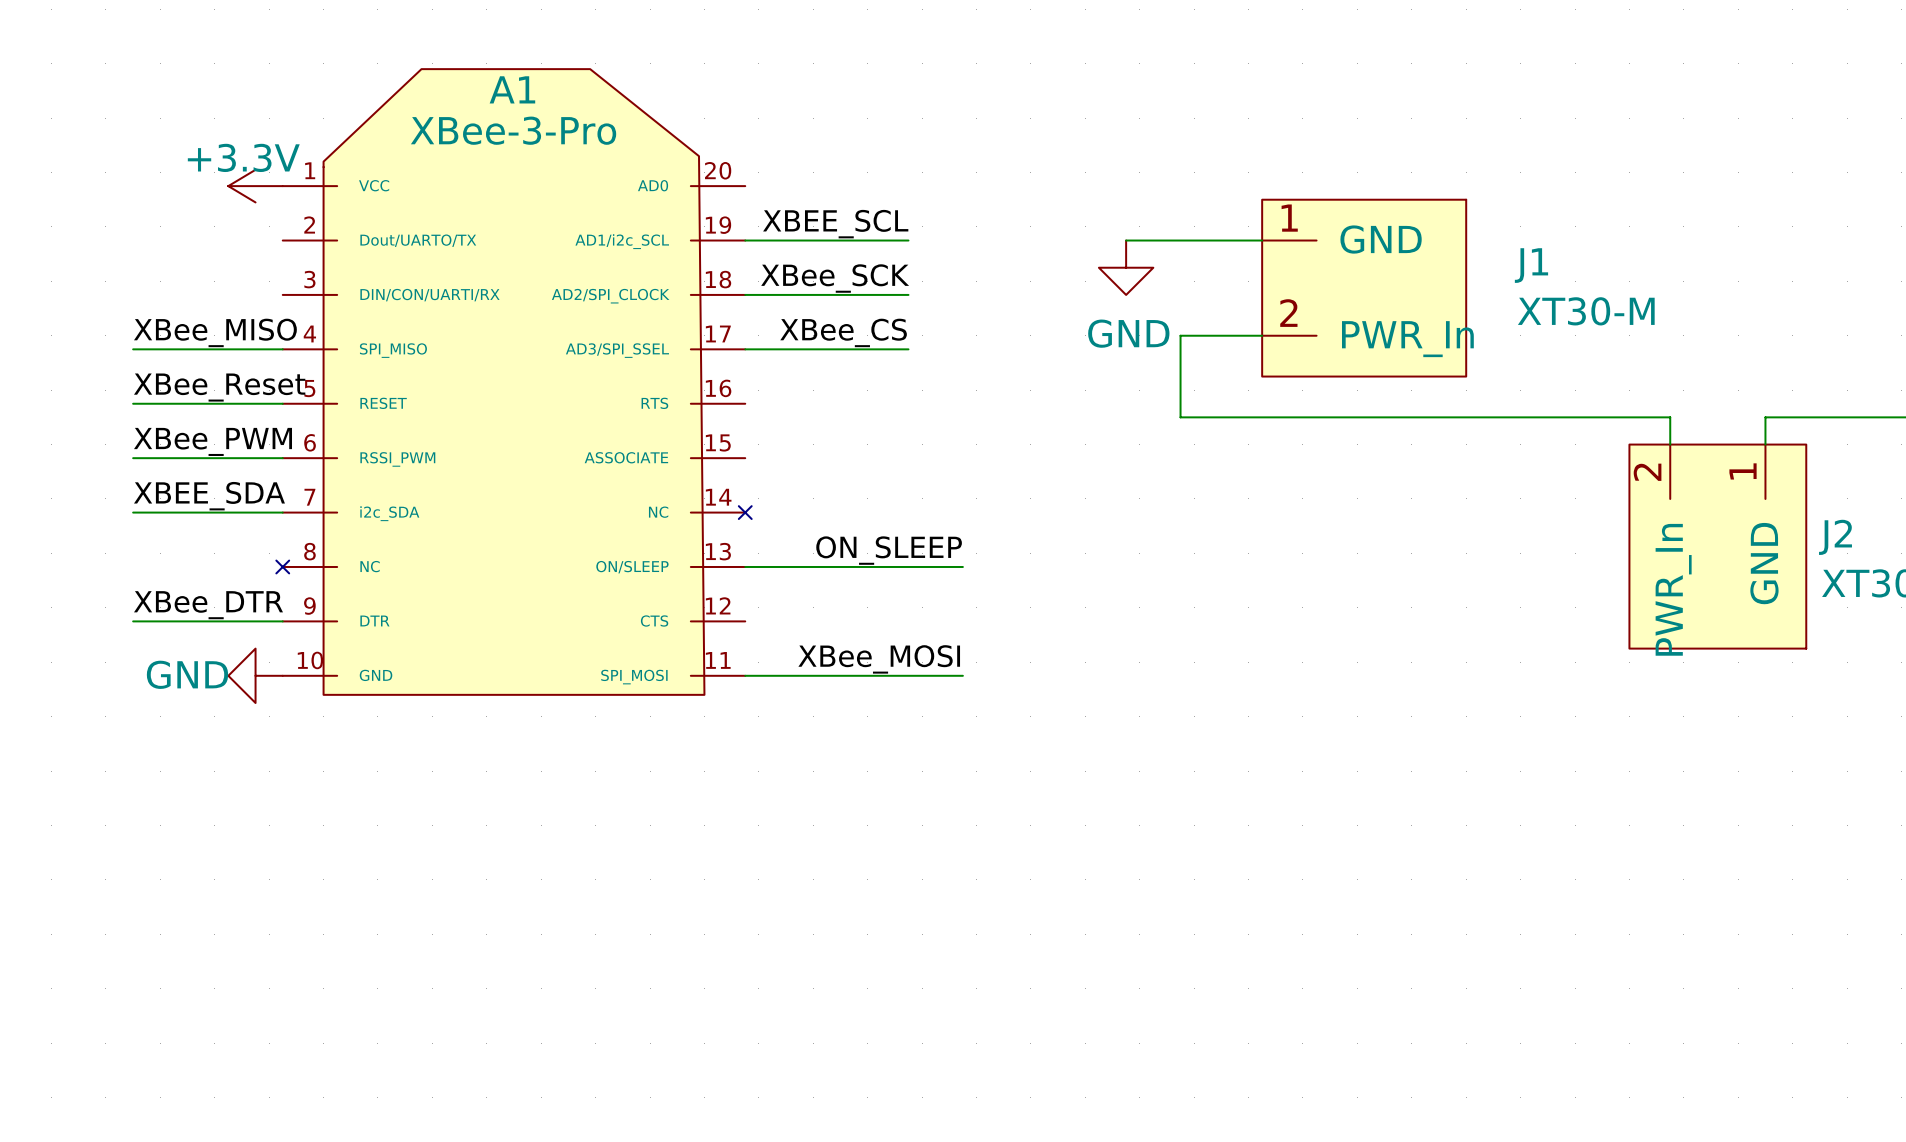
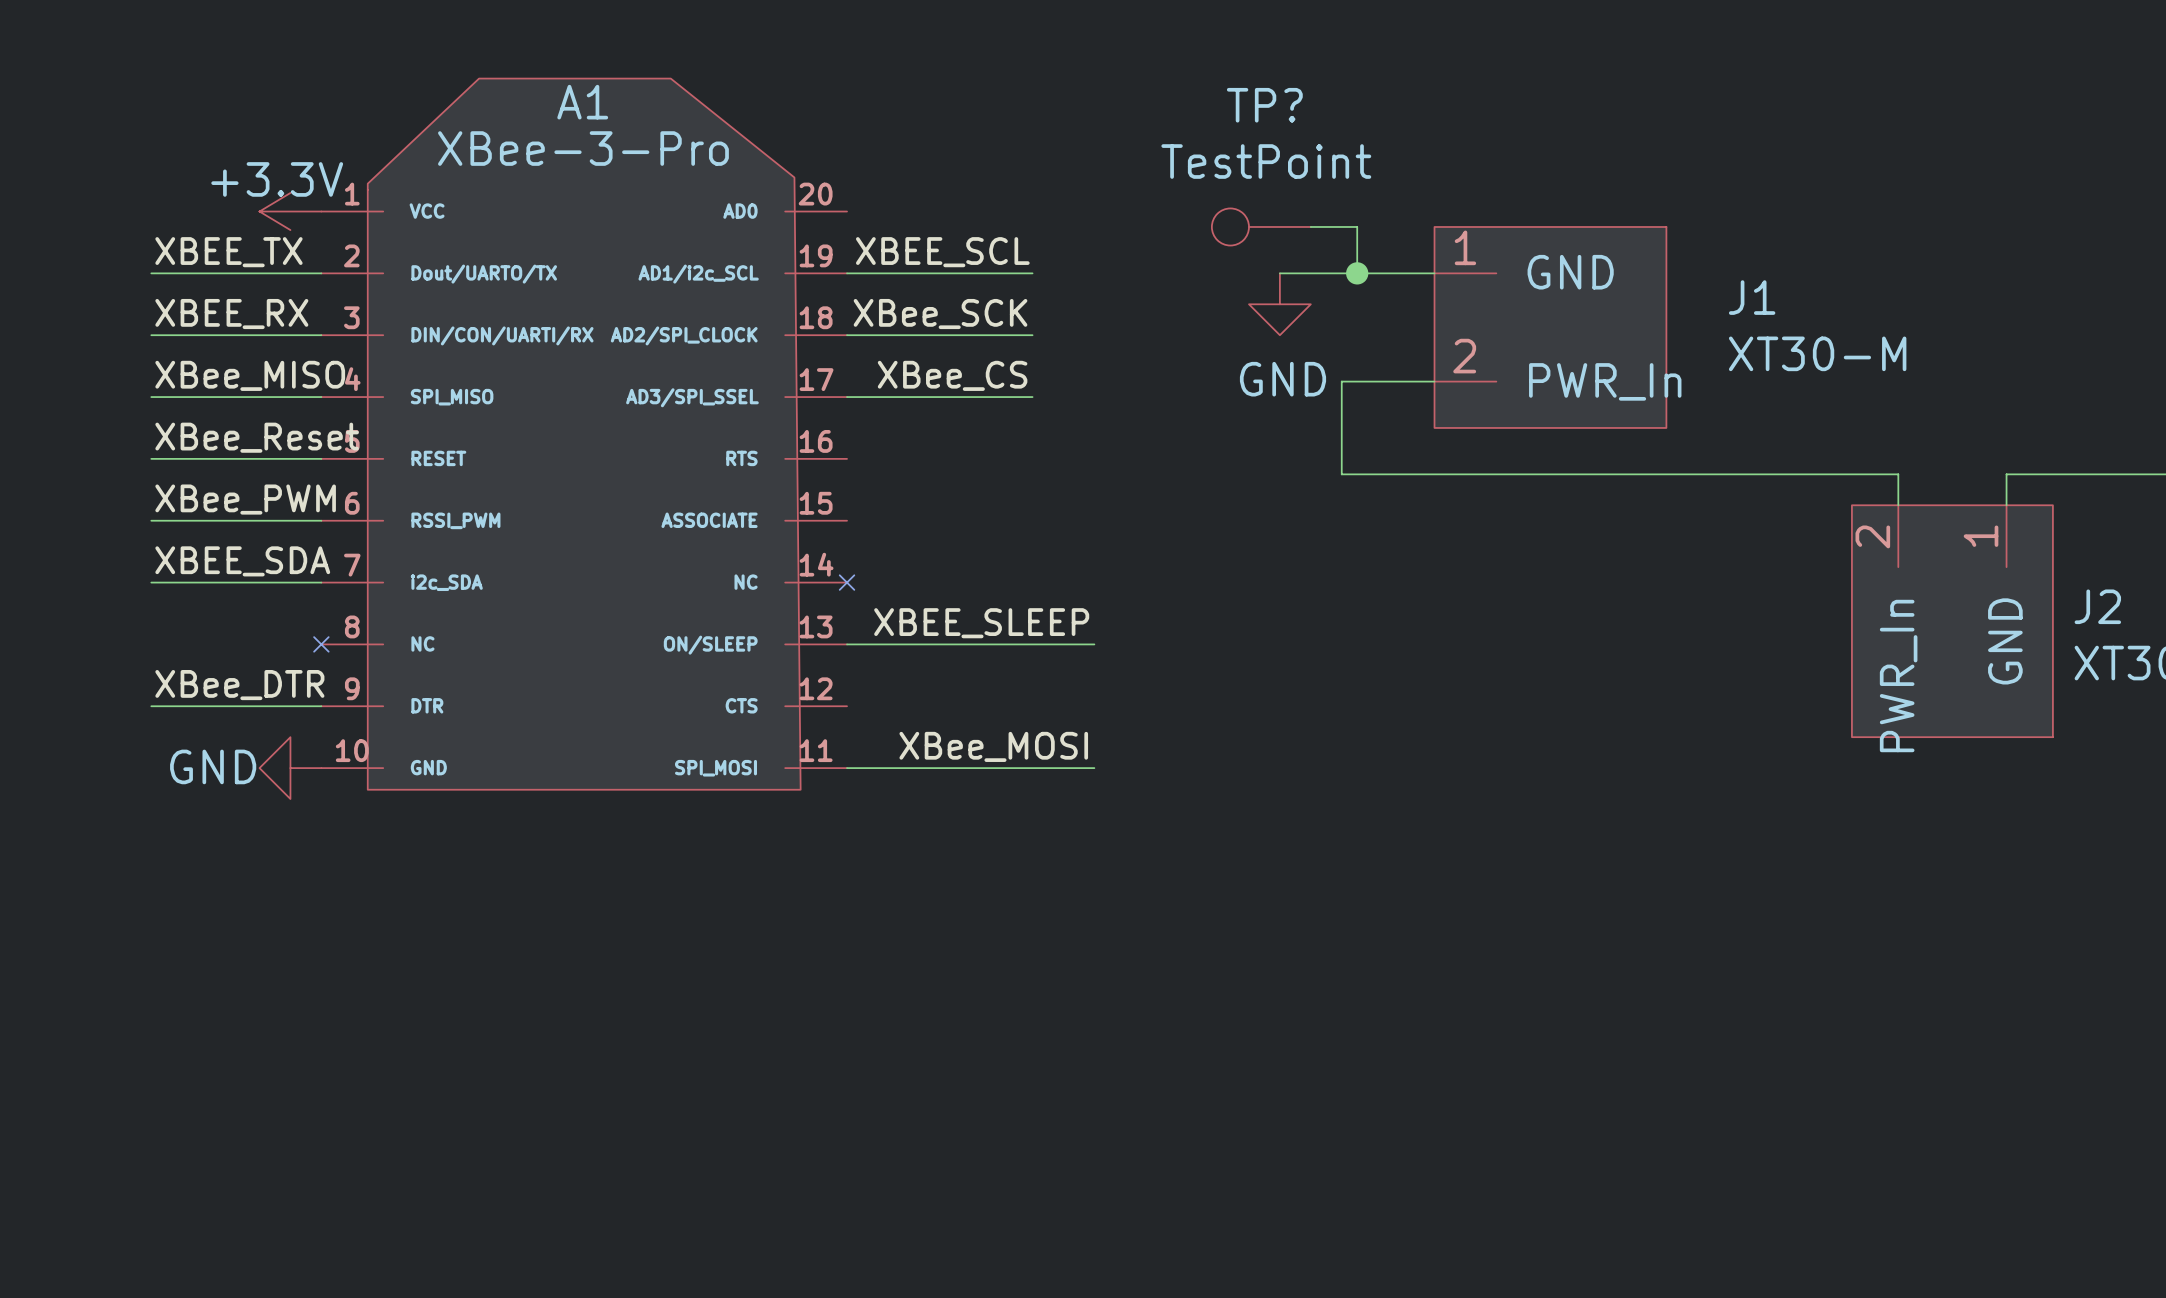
TP?: none -> TestPoint (1261, 226)
wire: none -> (1310, 226) (1357, 226) (1357, 273)
label: none -> XBEE_TX (228, 252)
wire: none -> (151, 273) (321, 273)
junction: none -> (1357, 273)
label: none -> XBEE_RX (231, 314)
wire: none -> (151, 335) (321, 335)
label: ON_SLEEP (889, 550) -> XBEE_SLEEP (981, 623)

